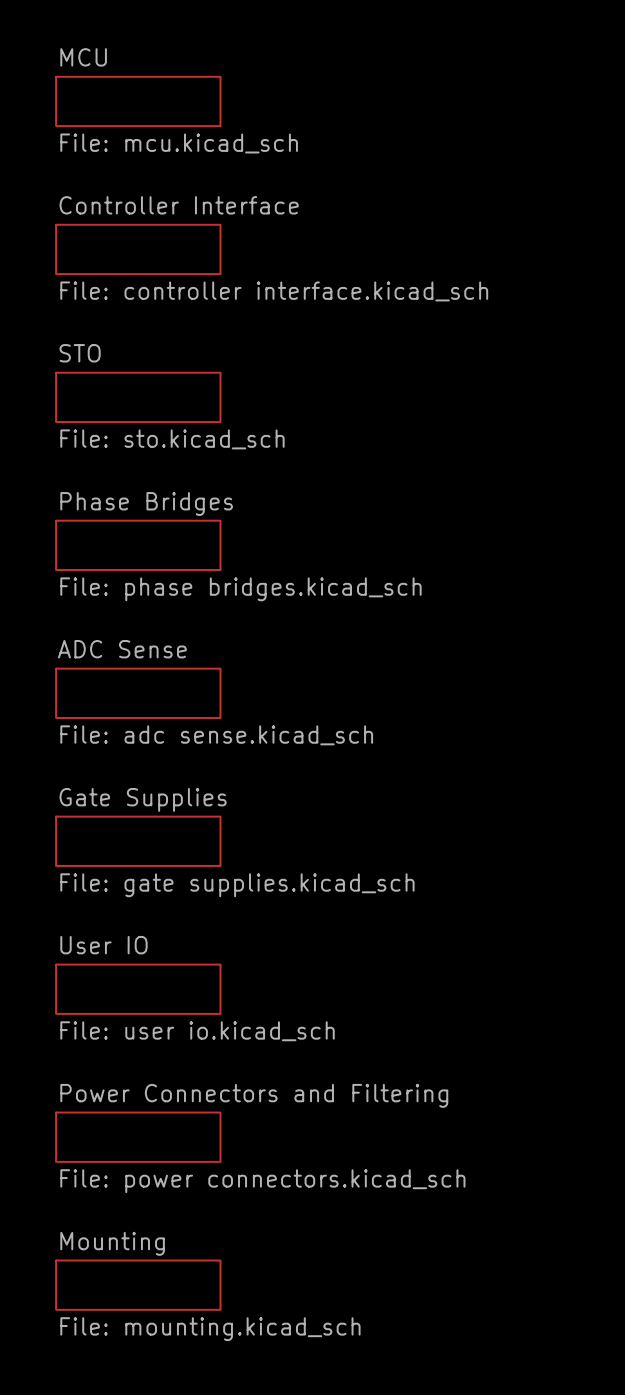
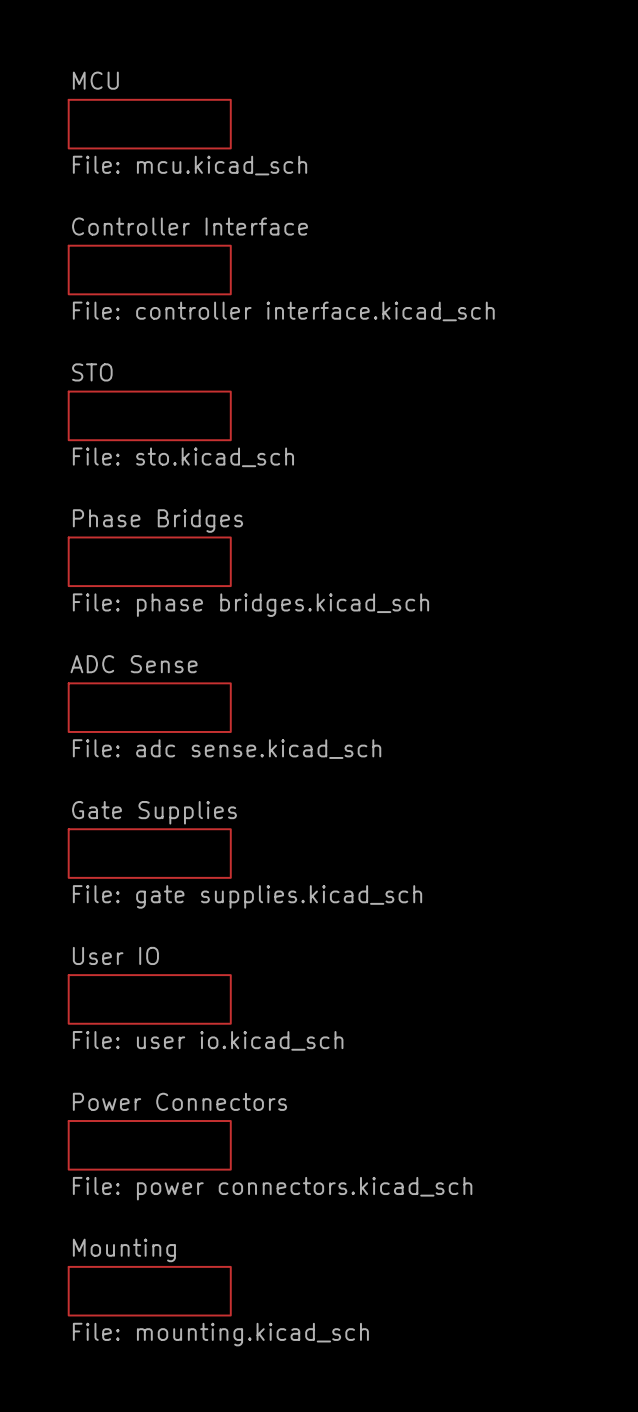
sheet Power Connectors and Filtering name: Power Connectors and Filtering (254, 1095) -> Power Connectors (179, 1101)

